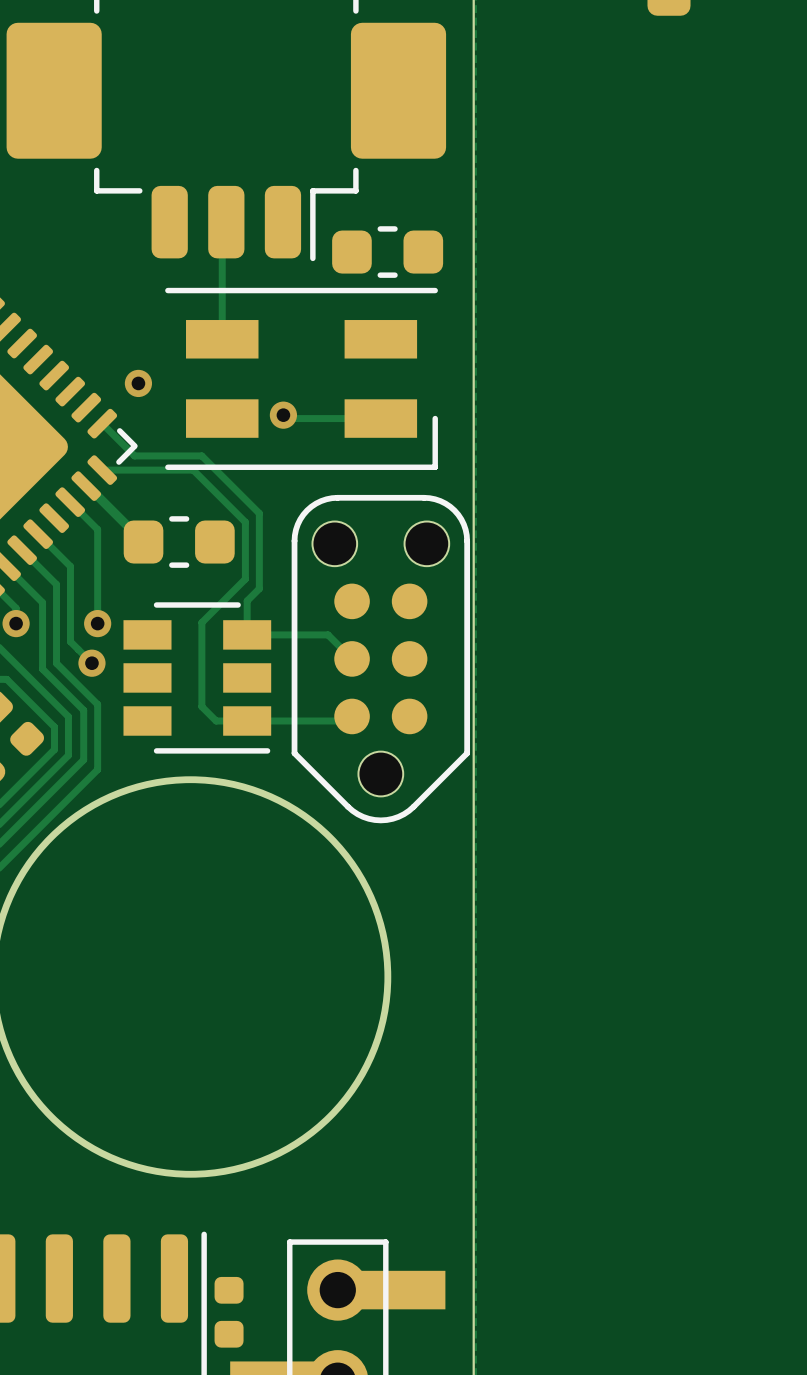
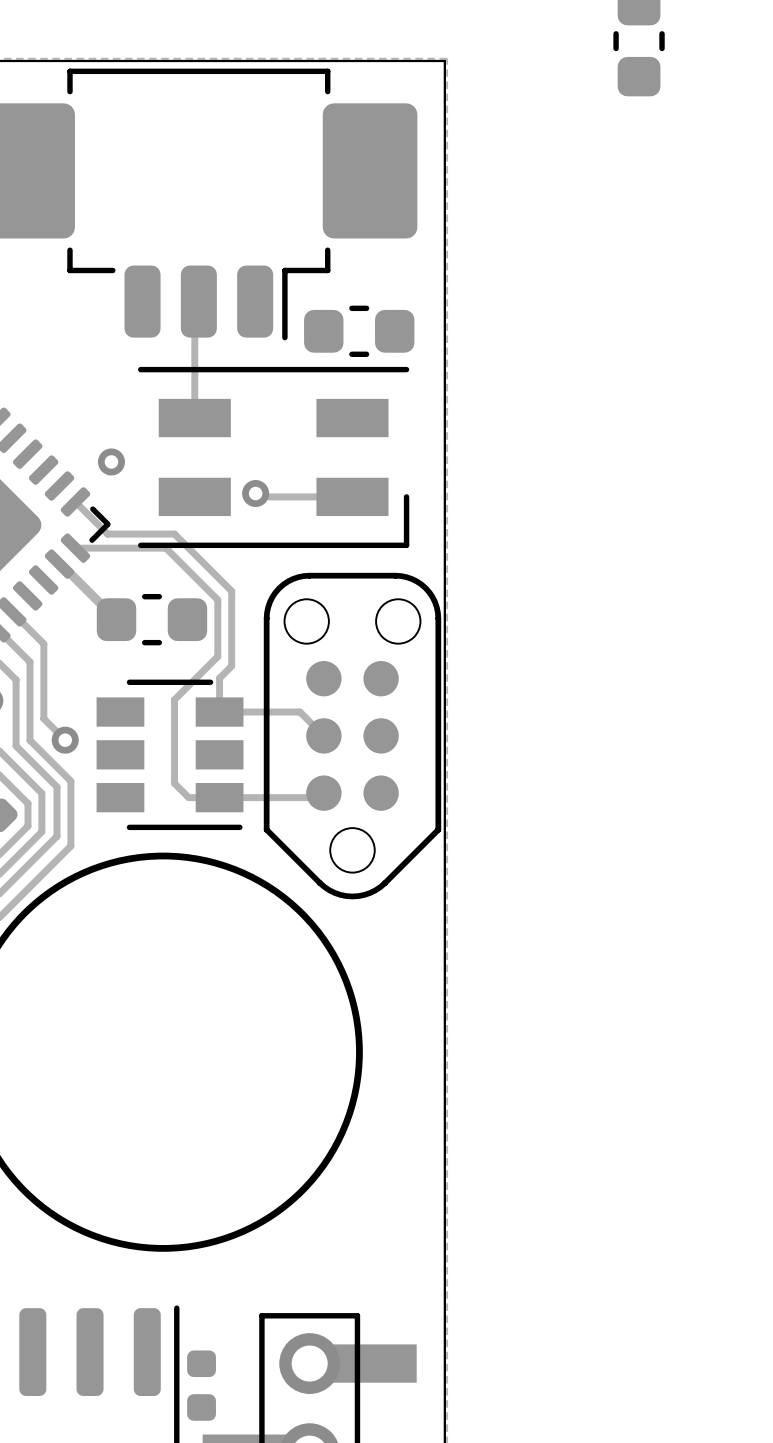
track: (70, 502) (97, 529) (97, 623) -> none
via: (97, 623) -> none

